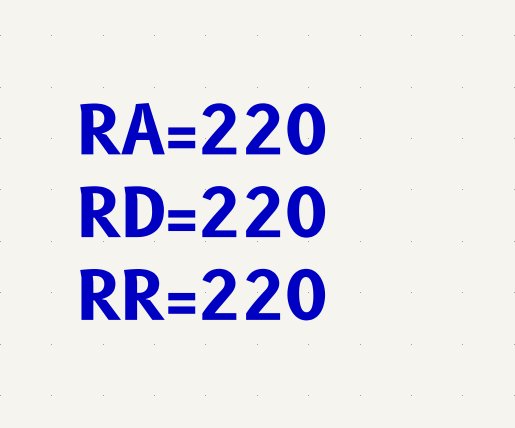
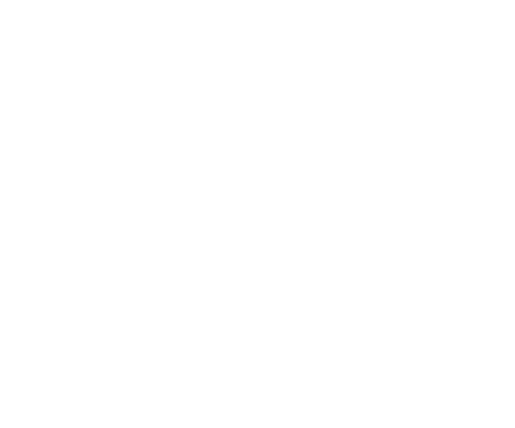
text: RA=220 (202, 128) -> none
text: RD=220 (202, 211) -> none
text: RR=220 (202, 294) -> none

